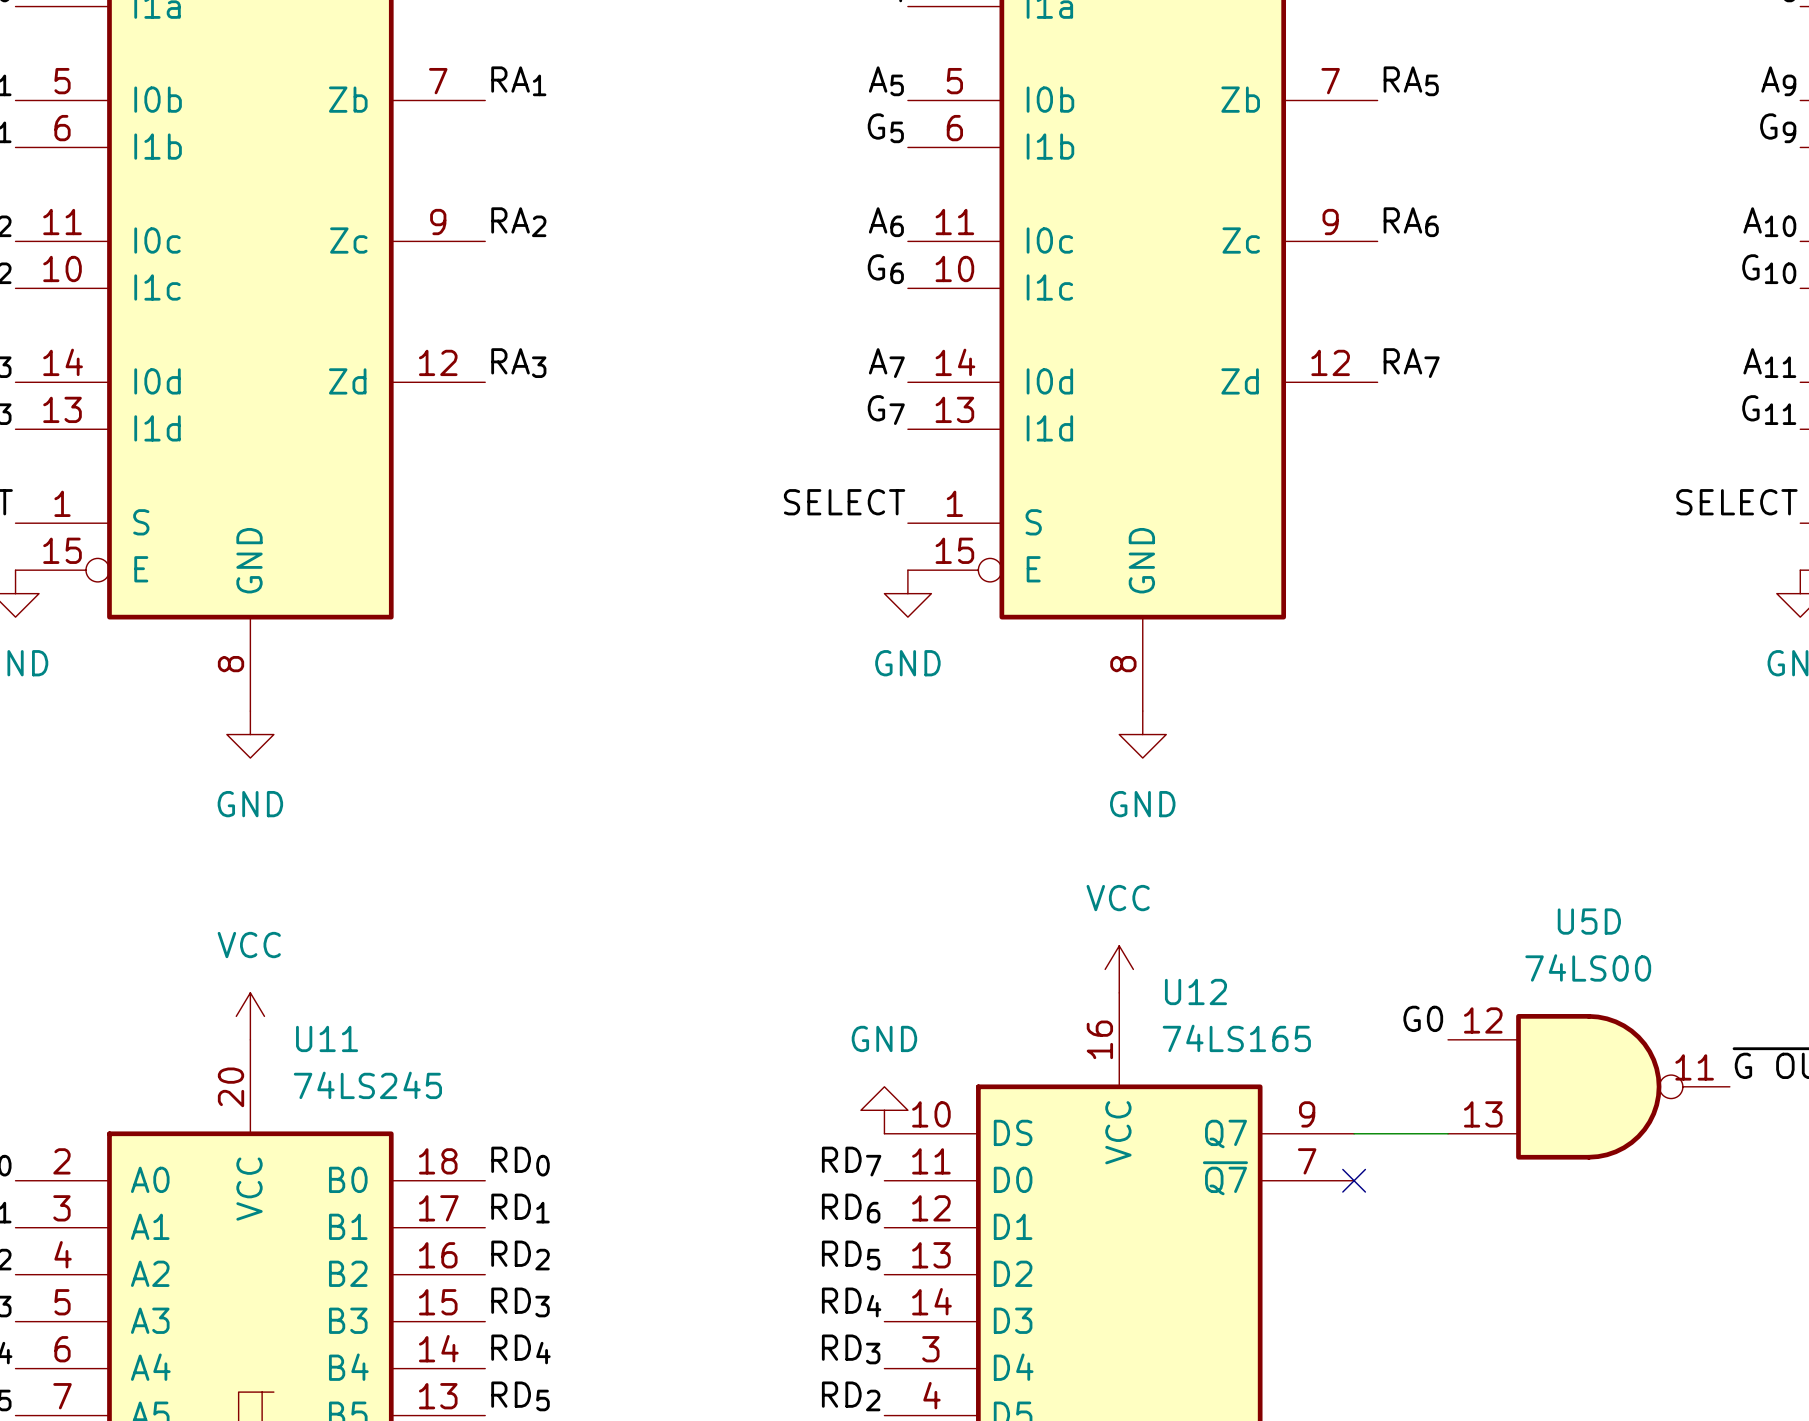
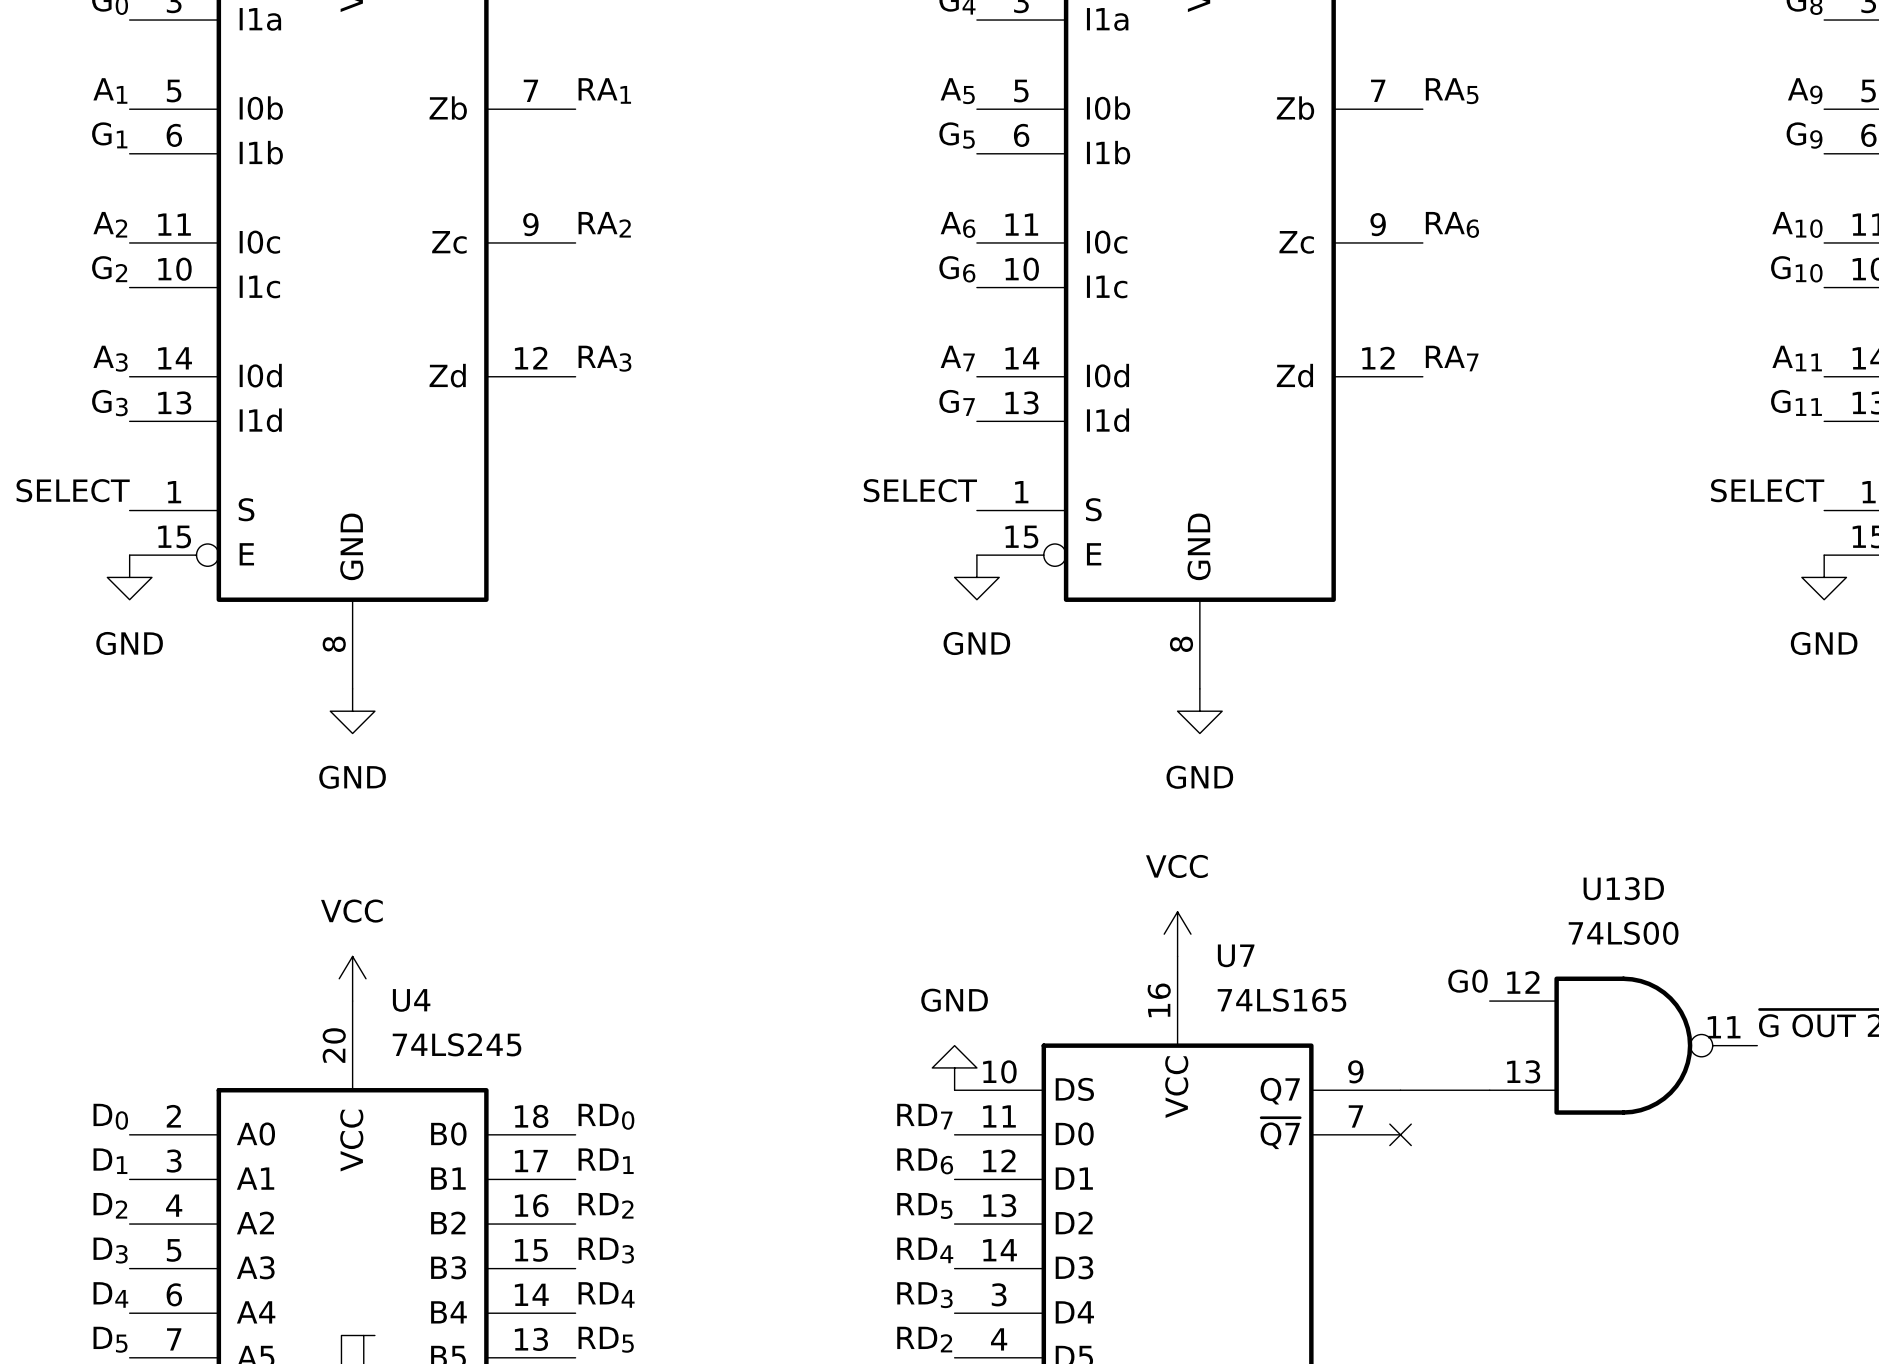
U5D name: U5D (1589, 921) -> U13D (1623, 888)
U12 name: U12 (1195, 991) -> U7 (1236, 955)
U11 name: U11 (327, 1038) -> U4 (411, 1000)

